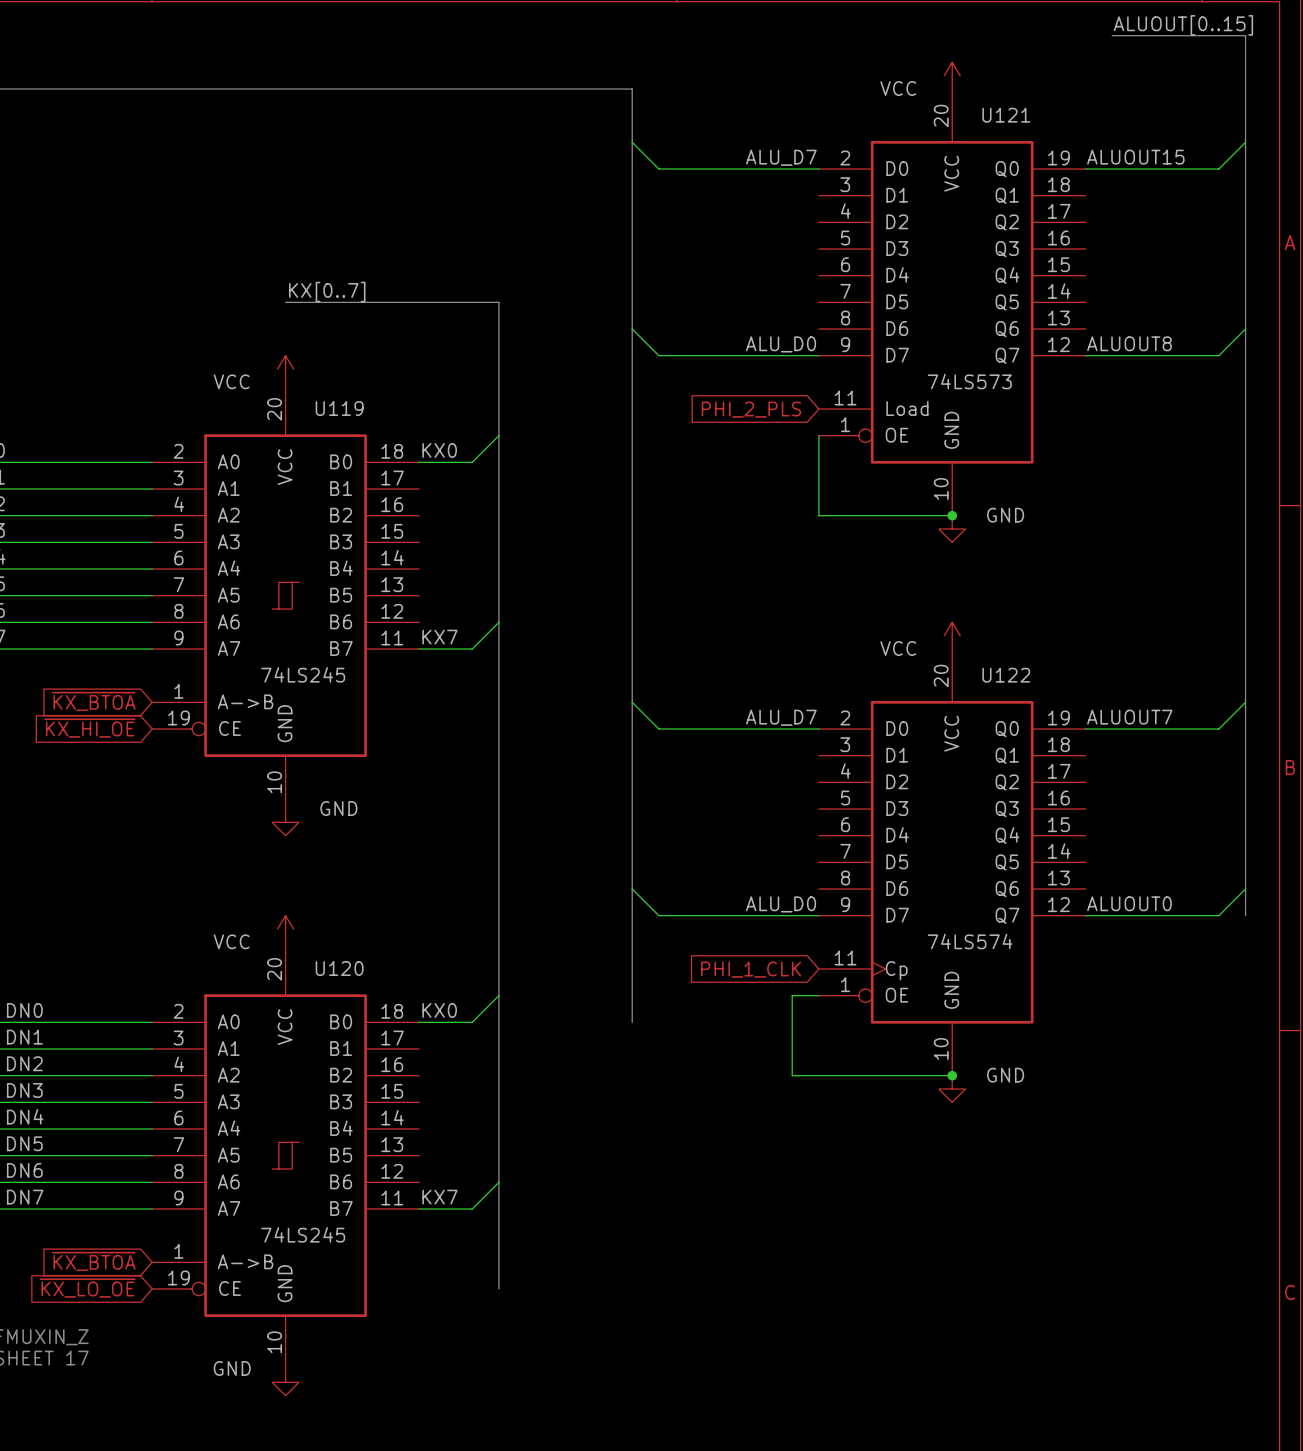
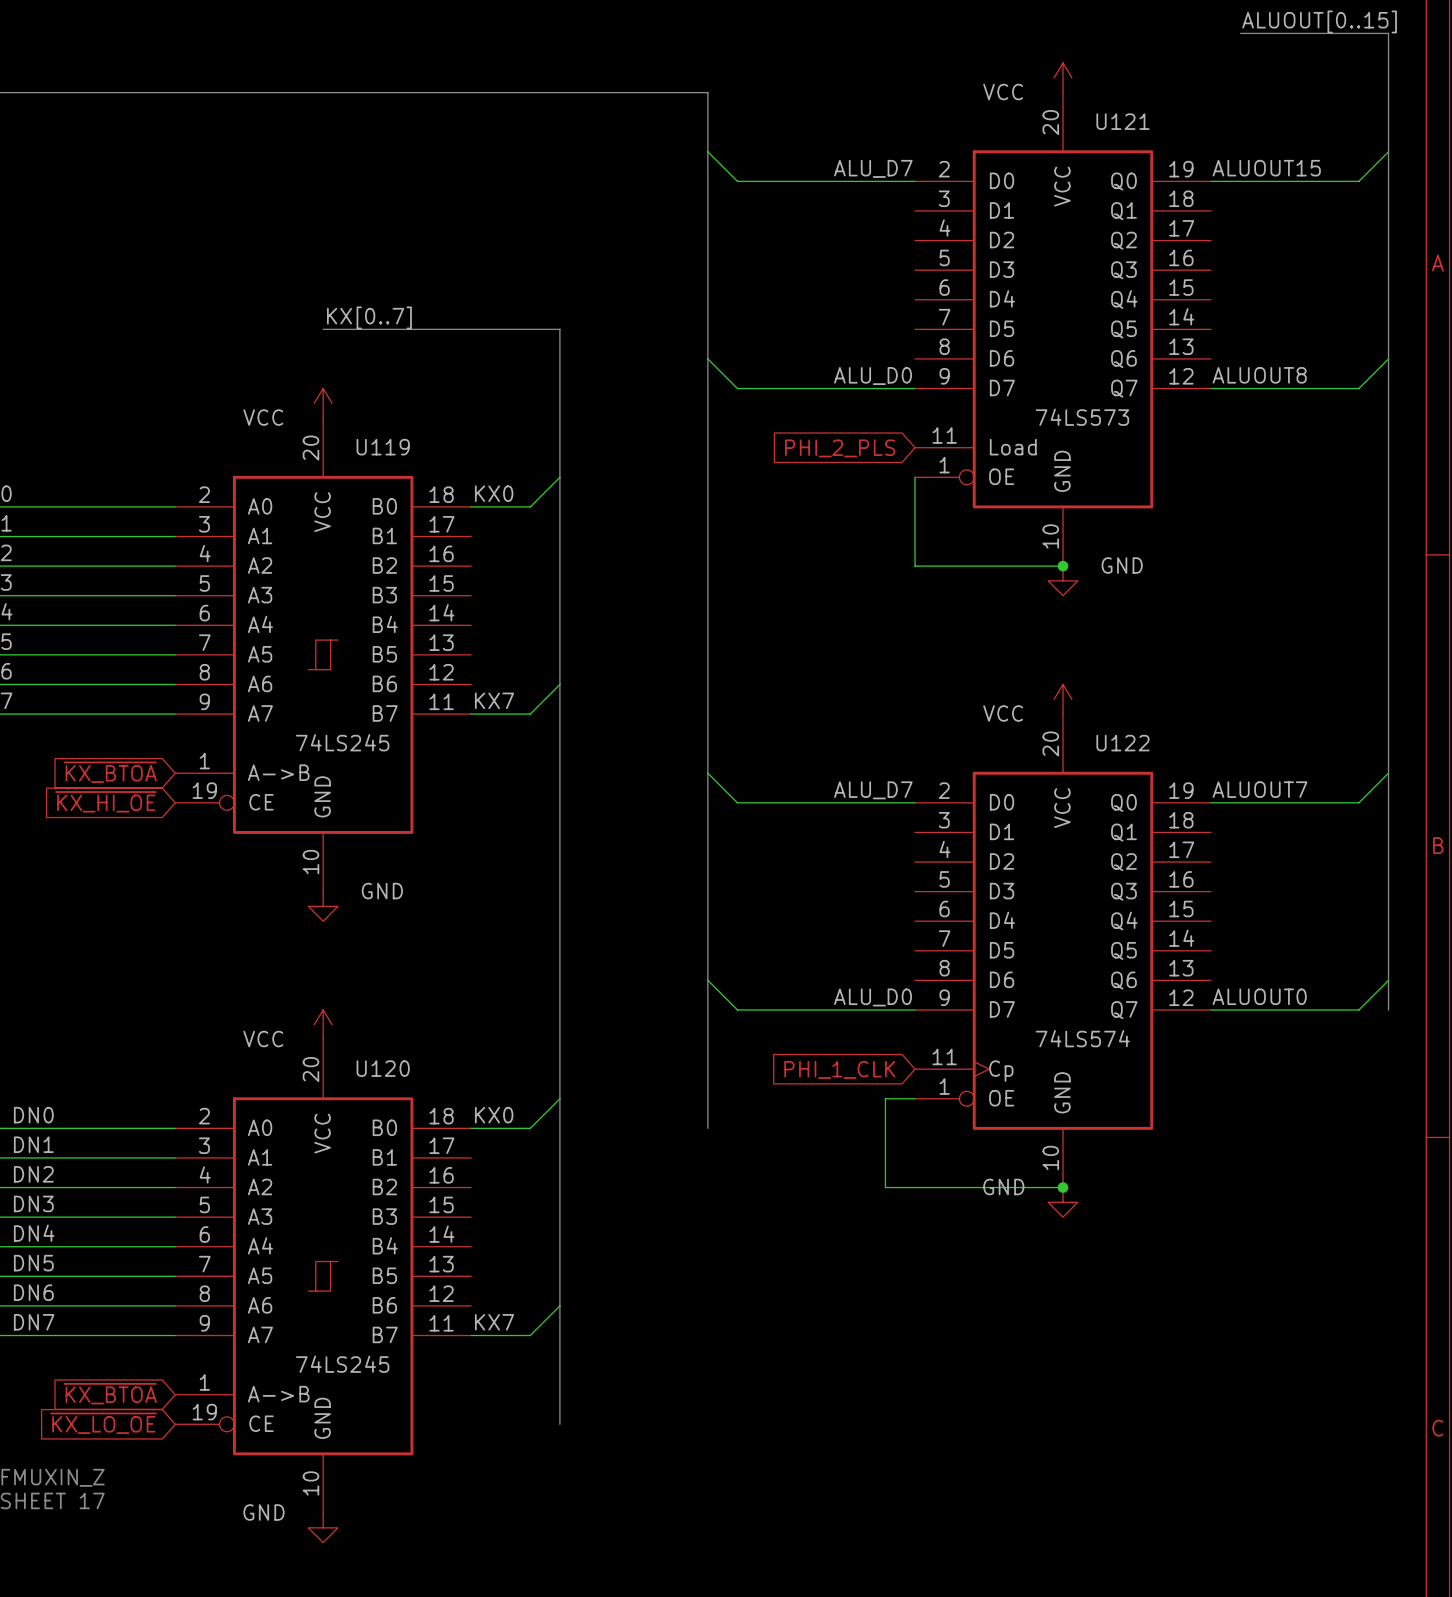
power symbol text position: GND (1005, 1075) -> GND (1003, 1186)

